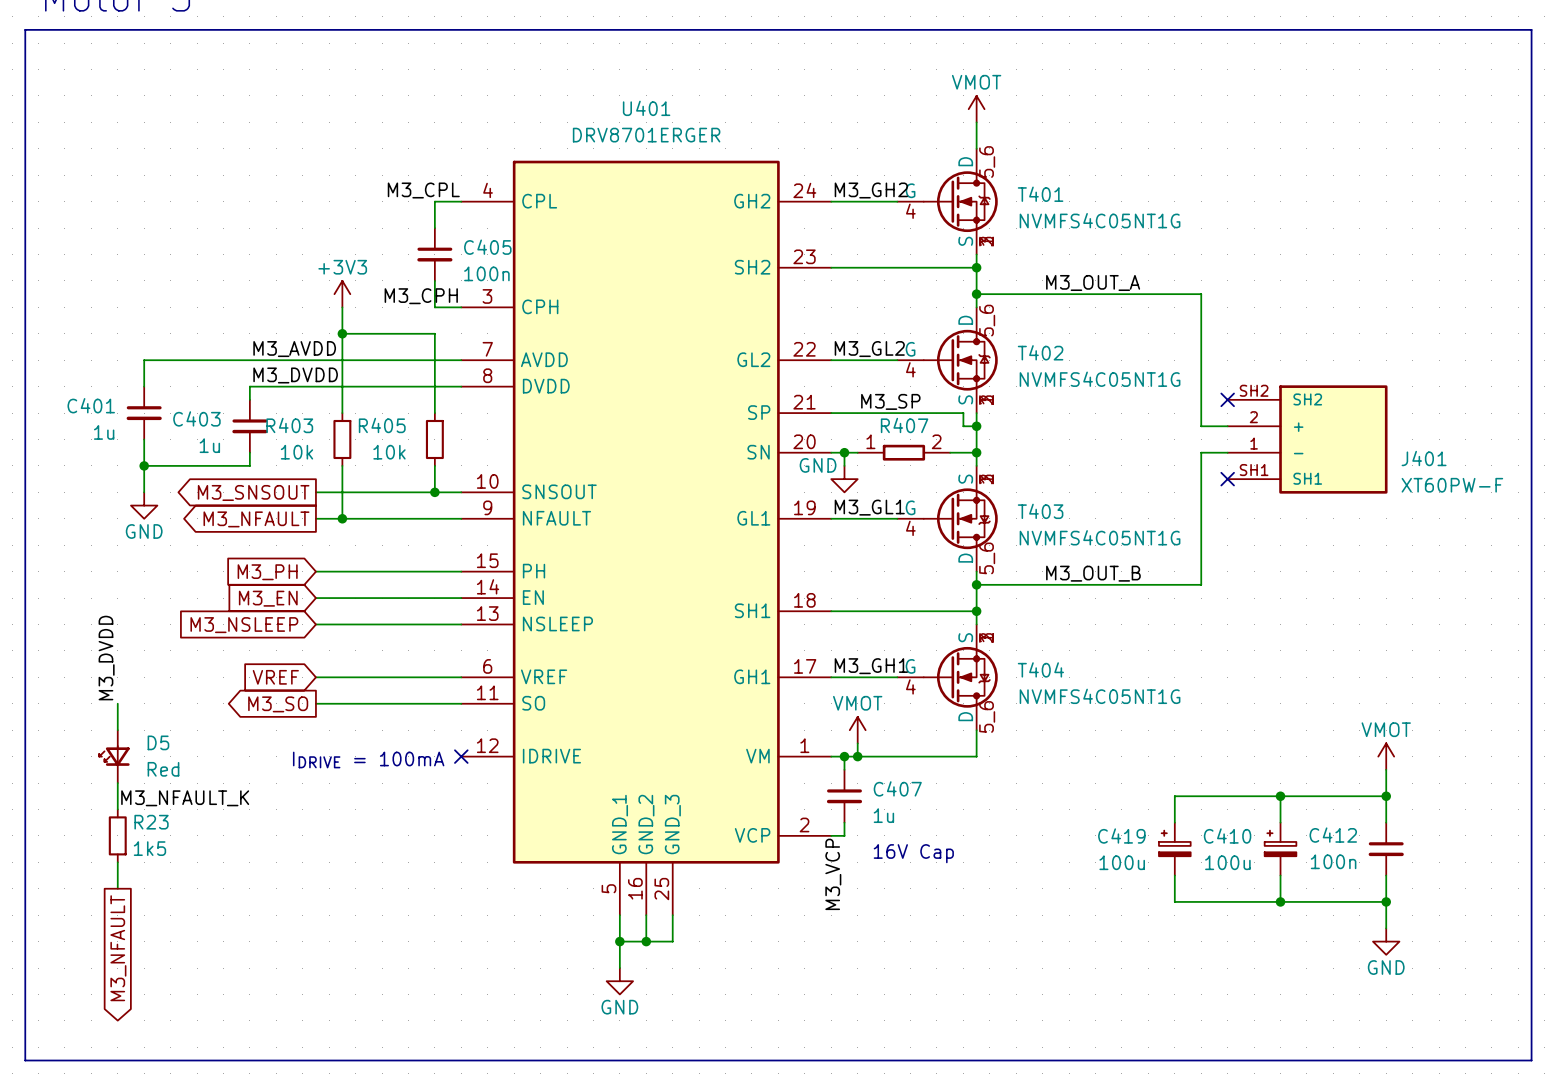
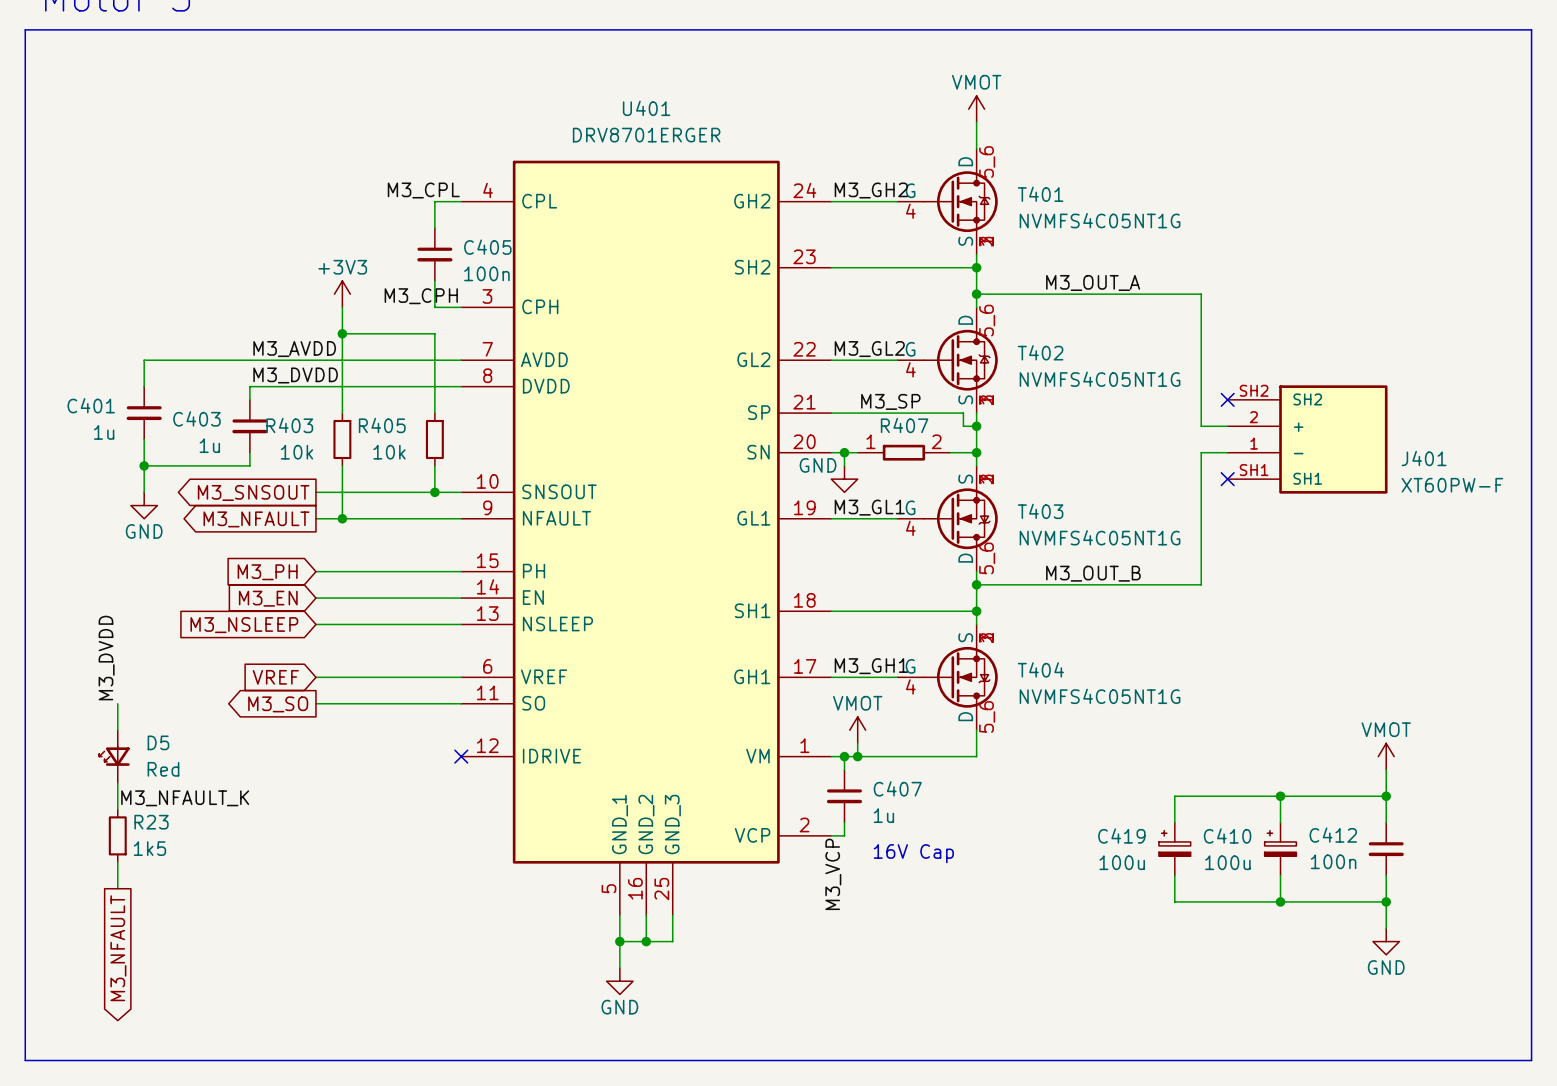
text: IDRIVE = 100mA (368, 759) -> none

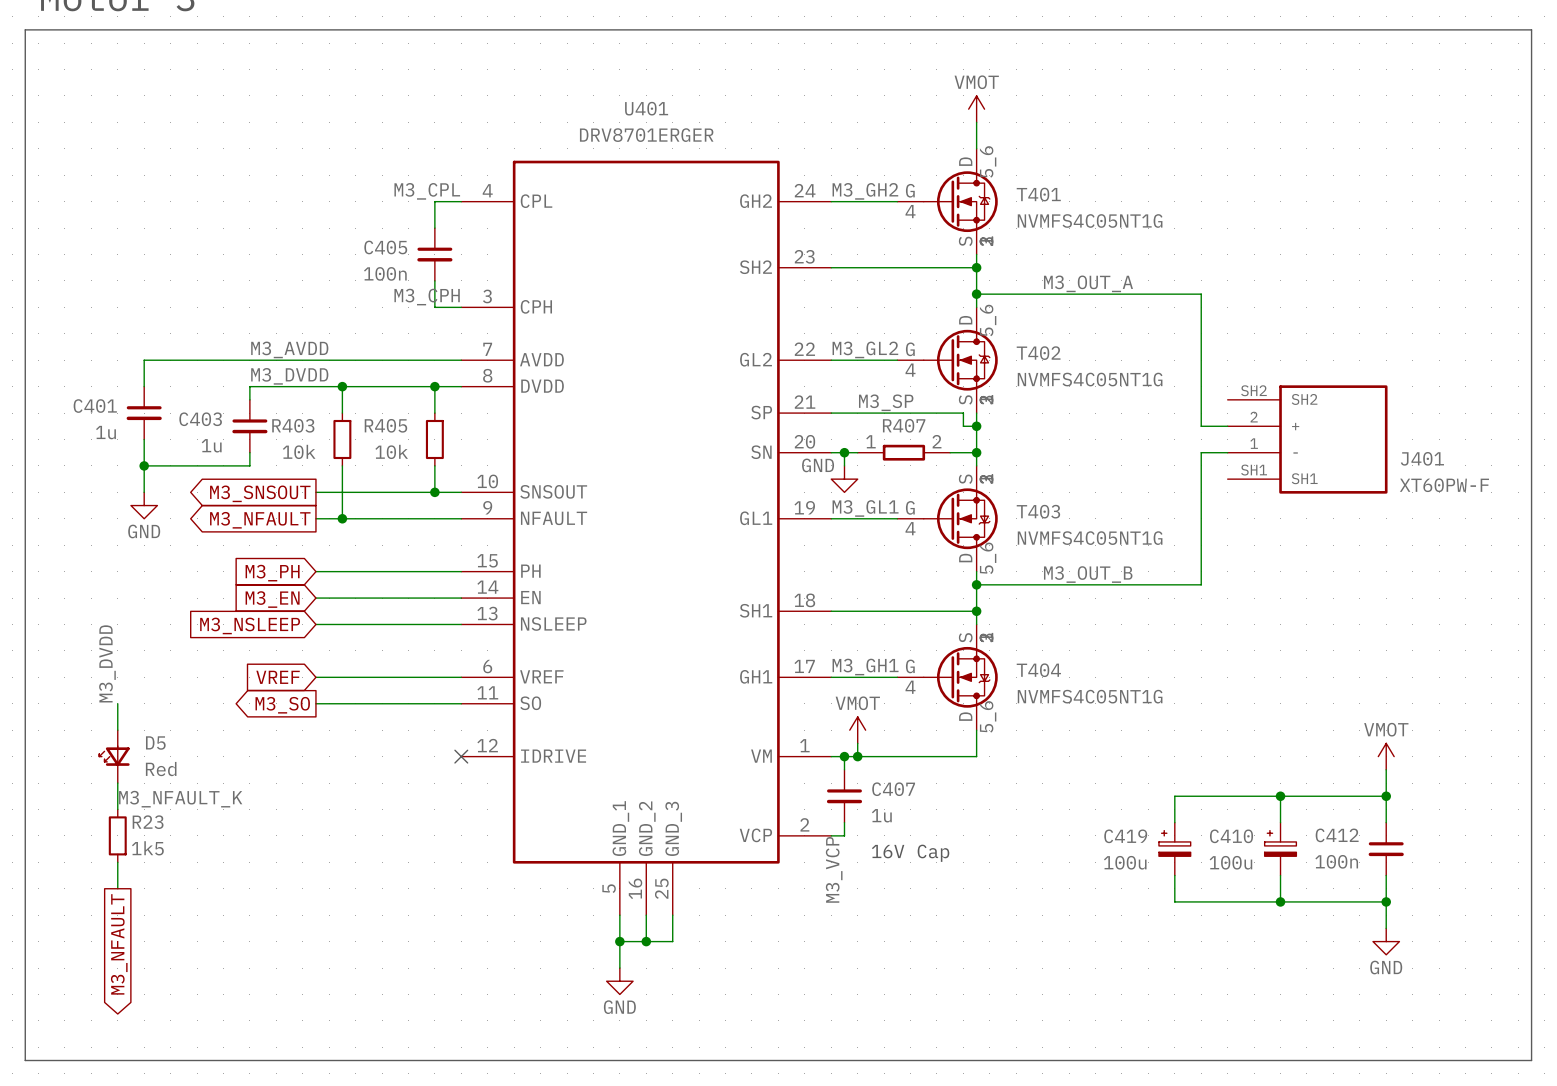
C405 name position: C405 (487, 247) -> C405 (385, 247)
C405 value position: 100n (486, 273) -> 100n (385, 273)
power symbol: +3V3 (342, 294) -> none
wire: (342, 307) (342, 386) -> none
wire: (342, 333) (434, 333) (434, 386) -> none
junction position: (342, 333) -> (342, 386)
junction: none -> (434, 386)
no-connect mark: (1227, 399) -> none
no-connect mark: (1227, 479) -> none

